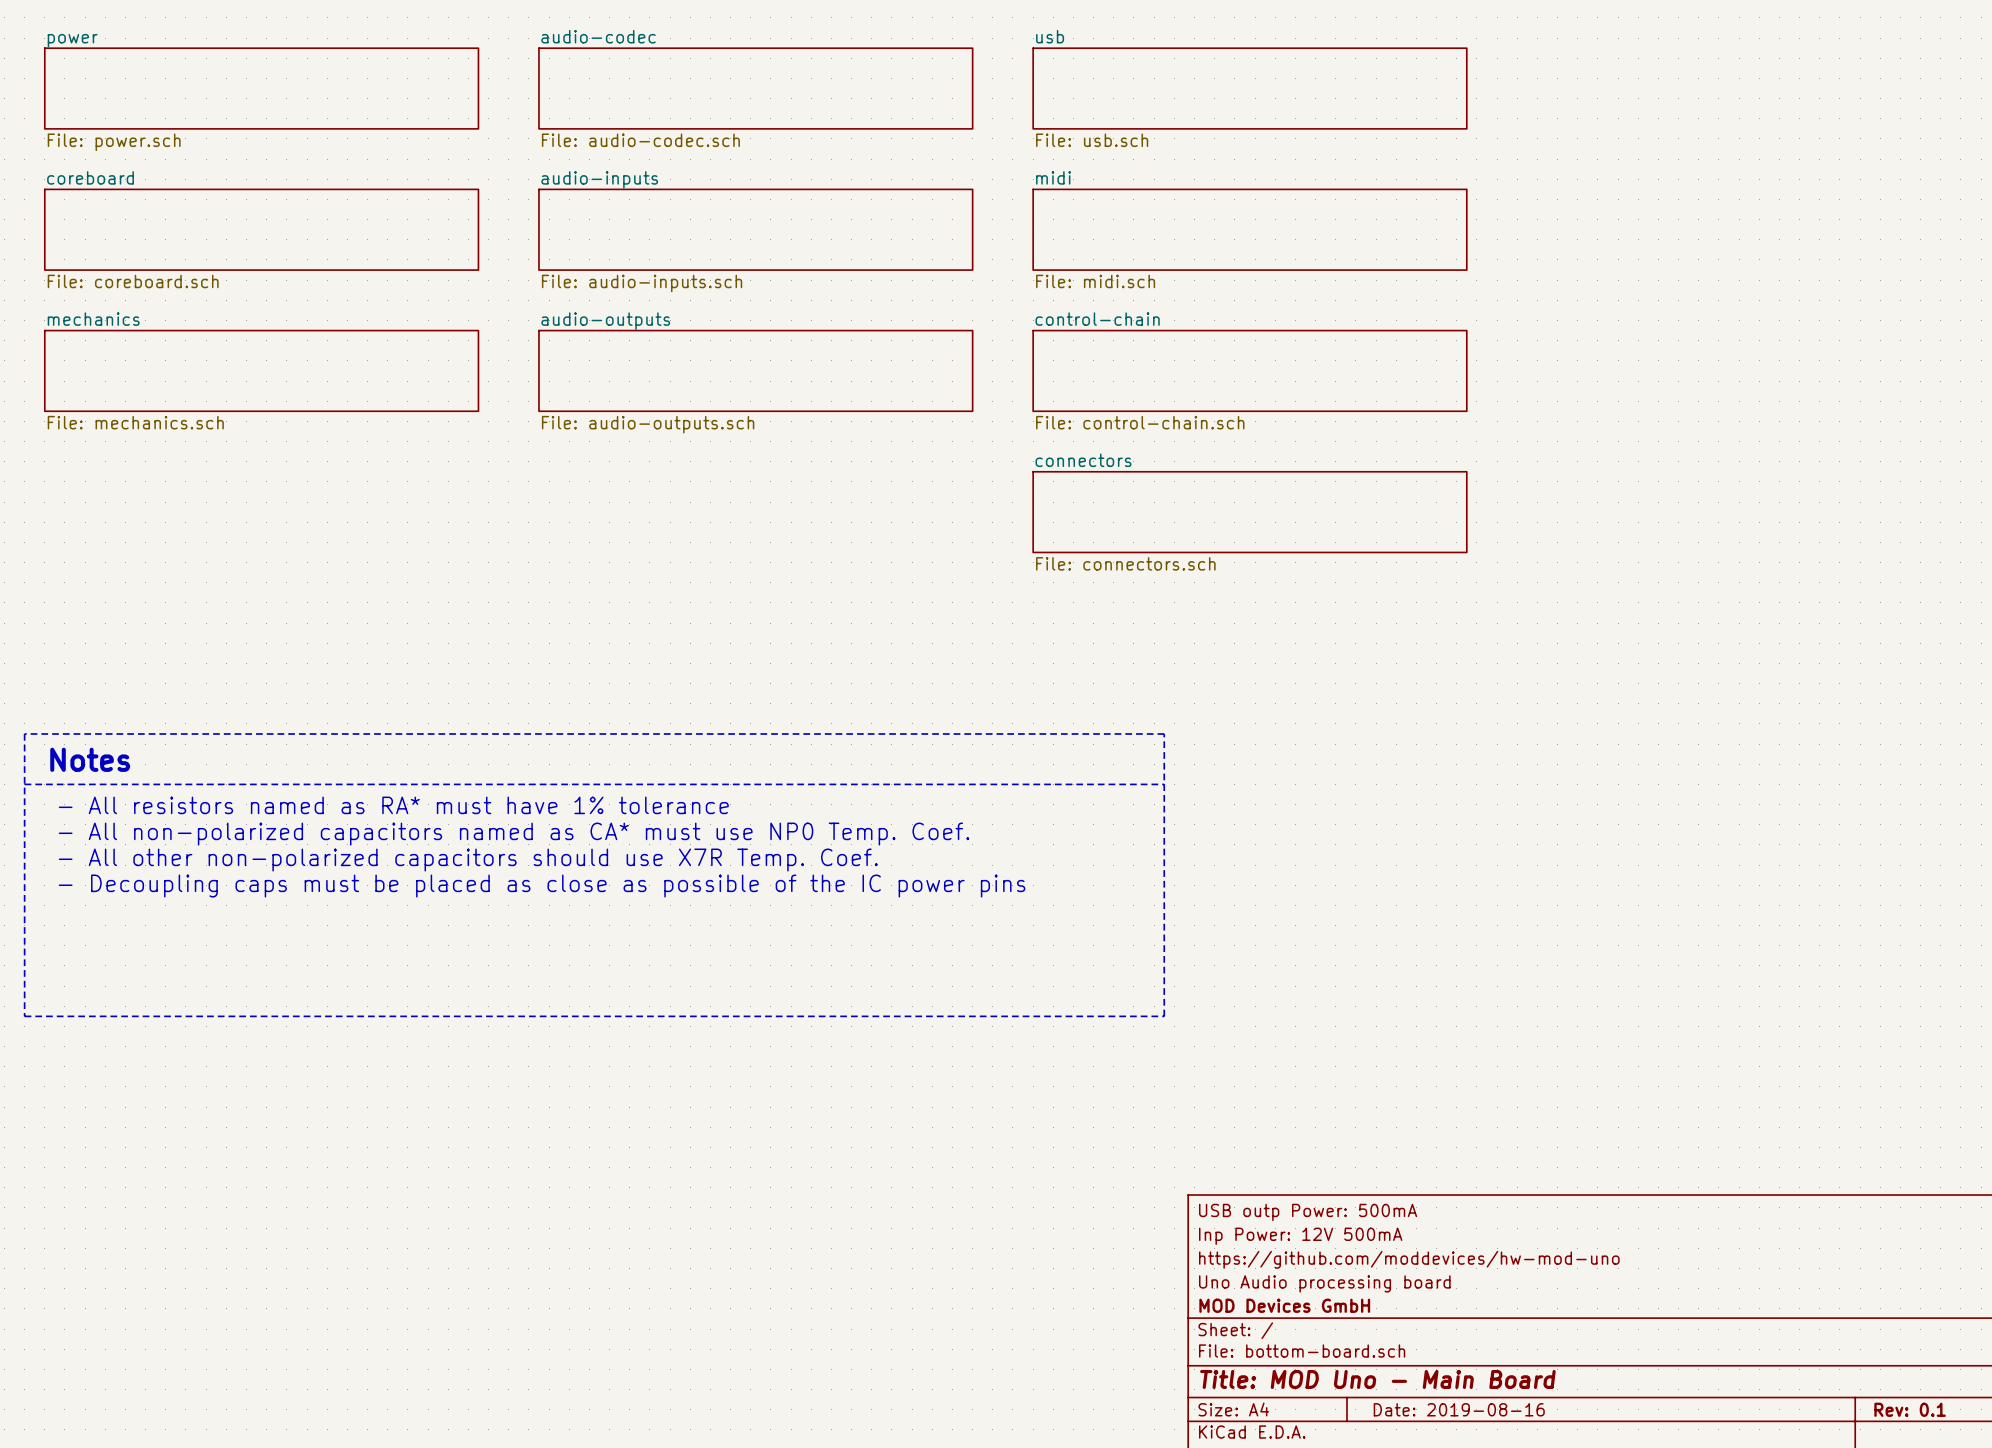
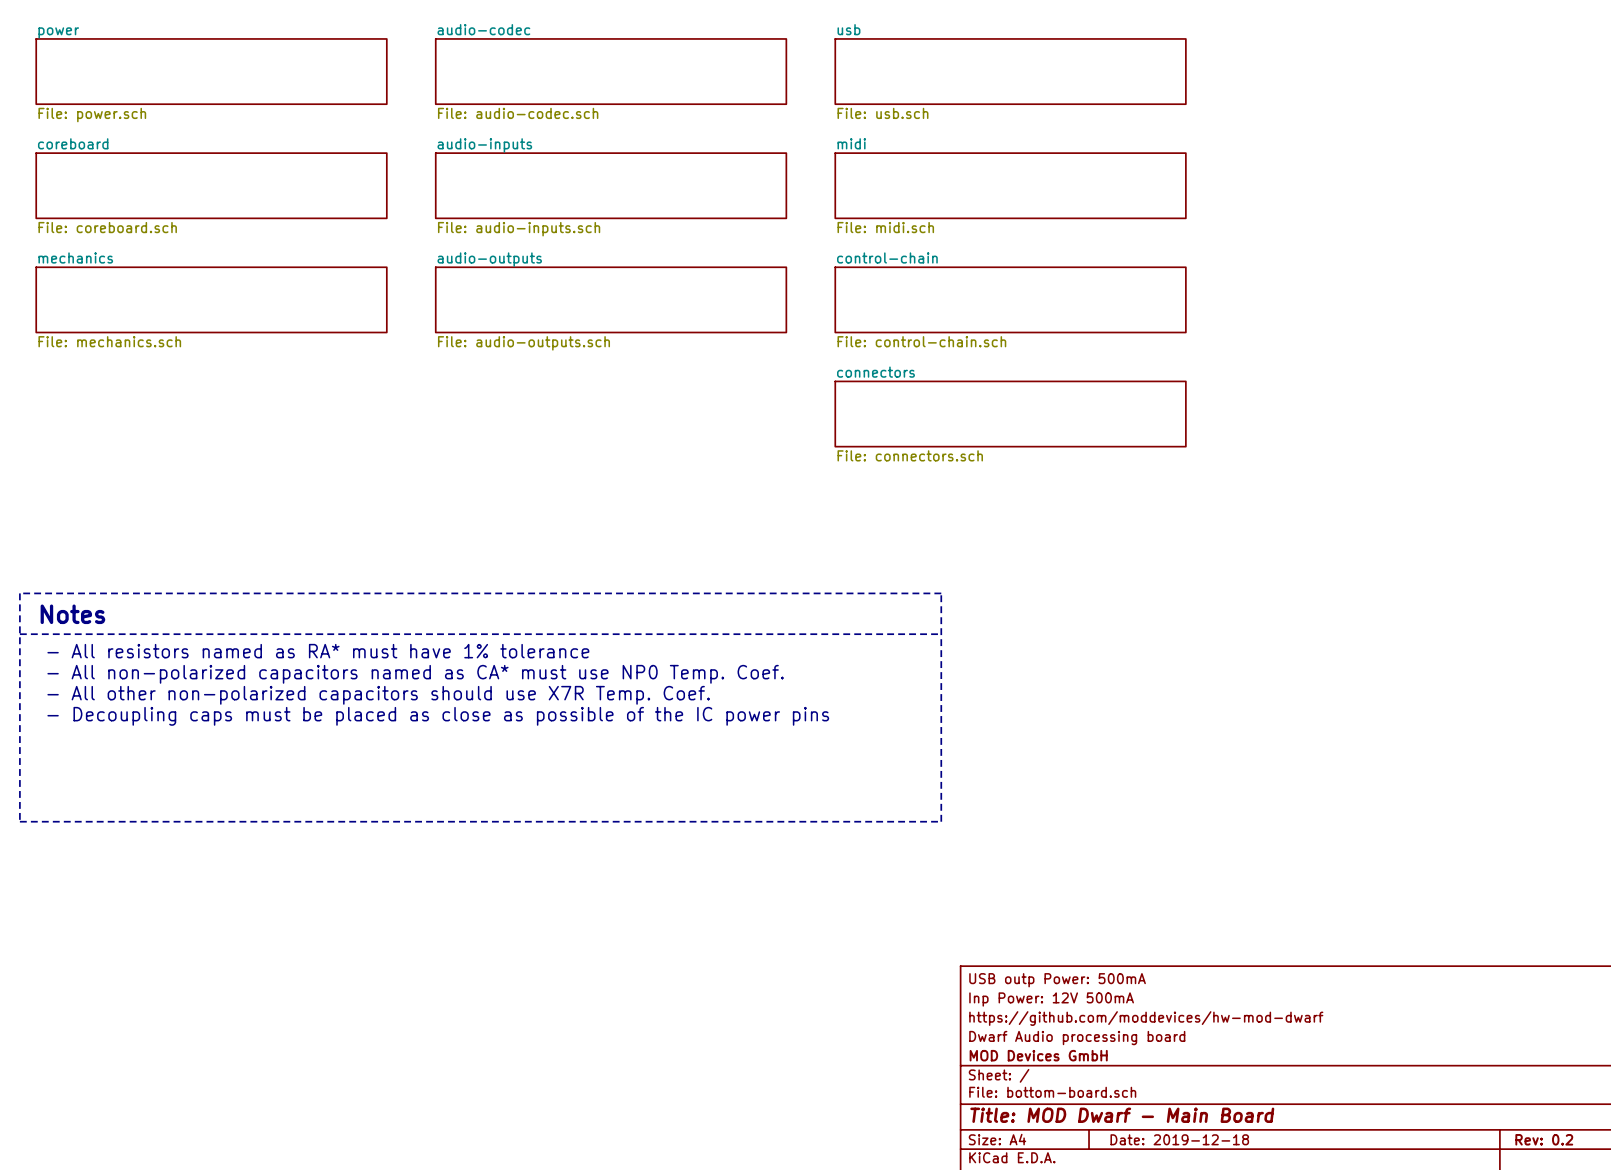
title block: https://github.com/moddevices/hw-mod-uno (1409, 1259) -> https://github.com/moddevices/hw-mod-dwarf (1146, 1018)
title block: Uno Audio processing board (1324, 1283) -> Dwarf Audio processing board (1077, 1038)
title block: Title: MOD Uno - Main Board (1377, 1379) -> Title: MOD Dwarf - Main Board (1122, 1115)
title block: Date: 2019-08-16 (1459, 1409) -> Date: 2019-12-18 (1179, 1139)
title block: Rev: 0.1 (1910, 1409) -> Rev: 0.2 (1544, 1139)

